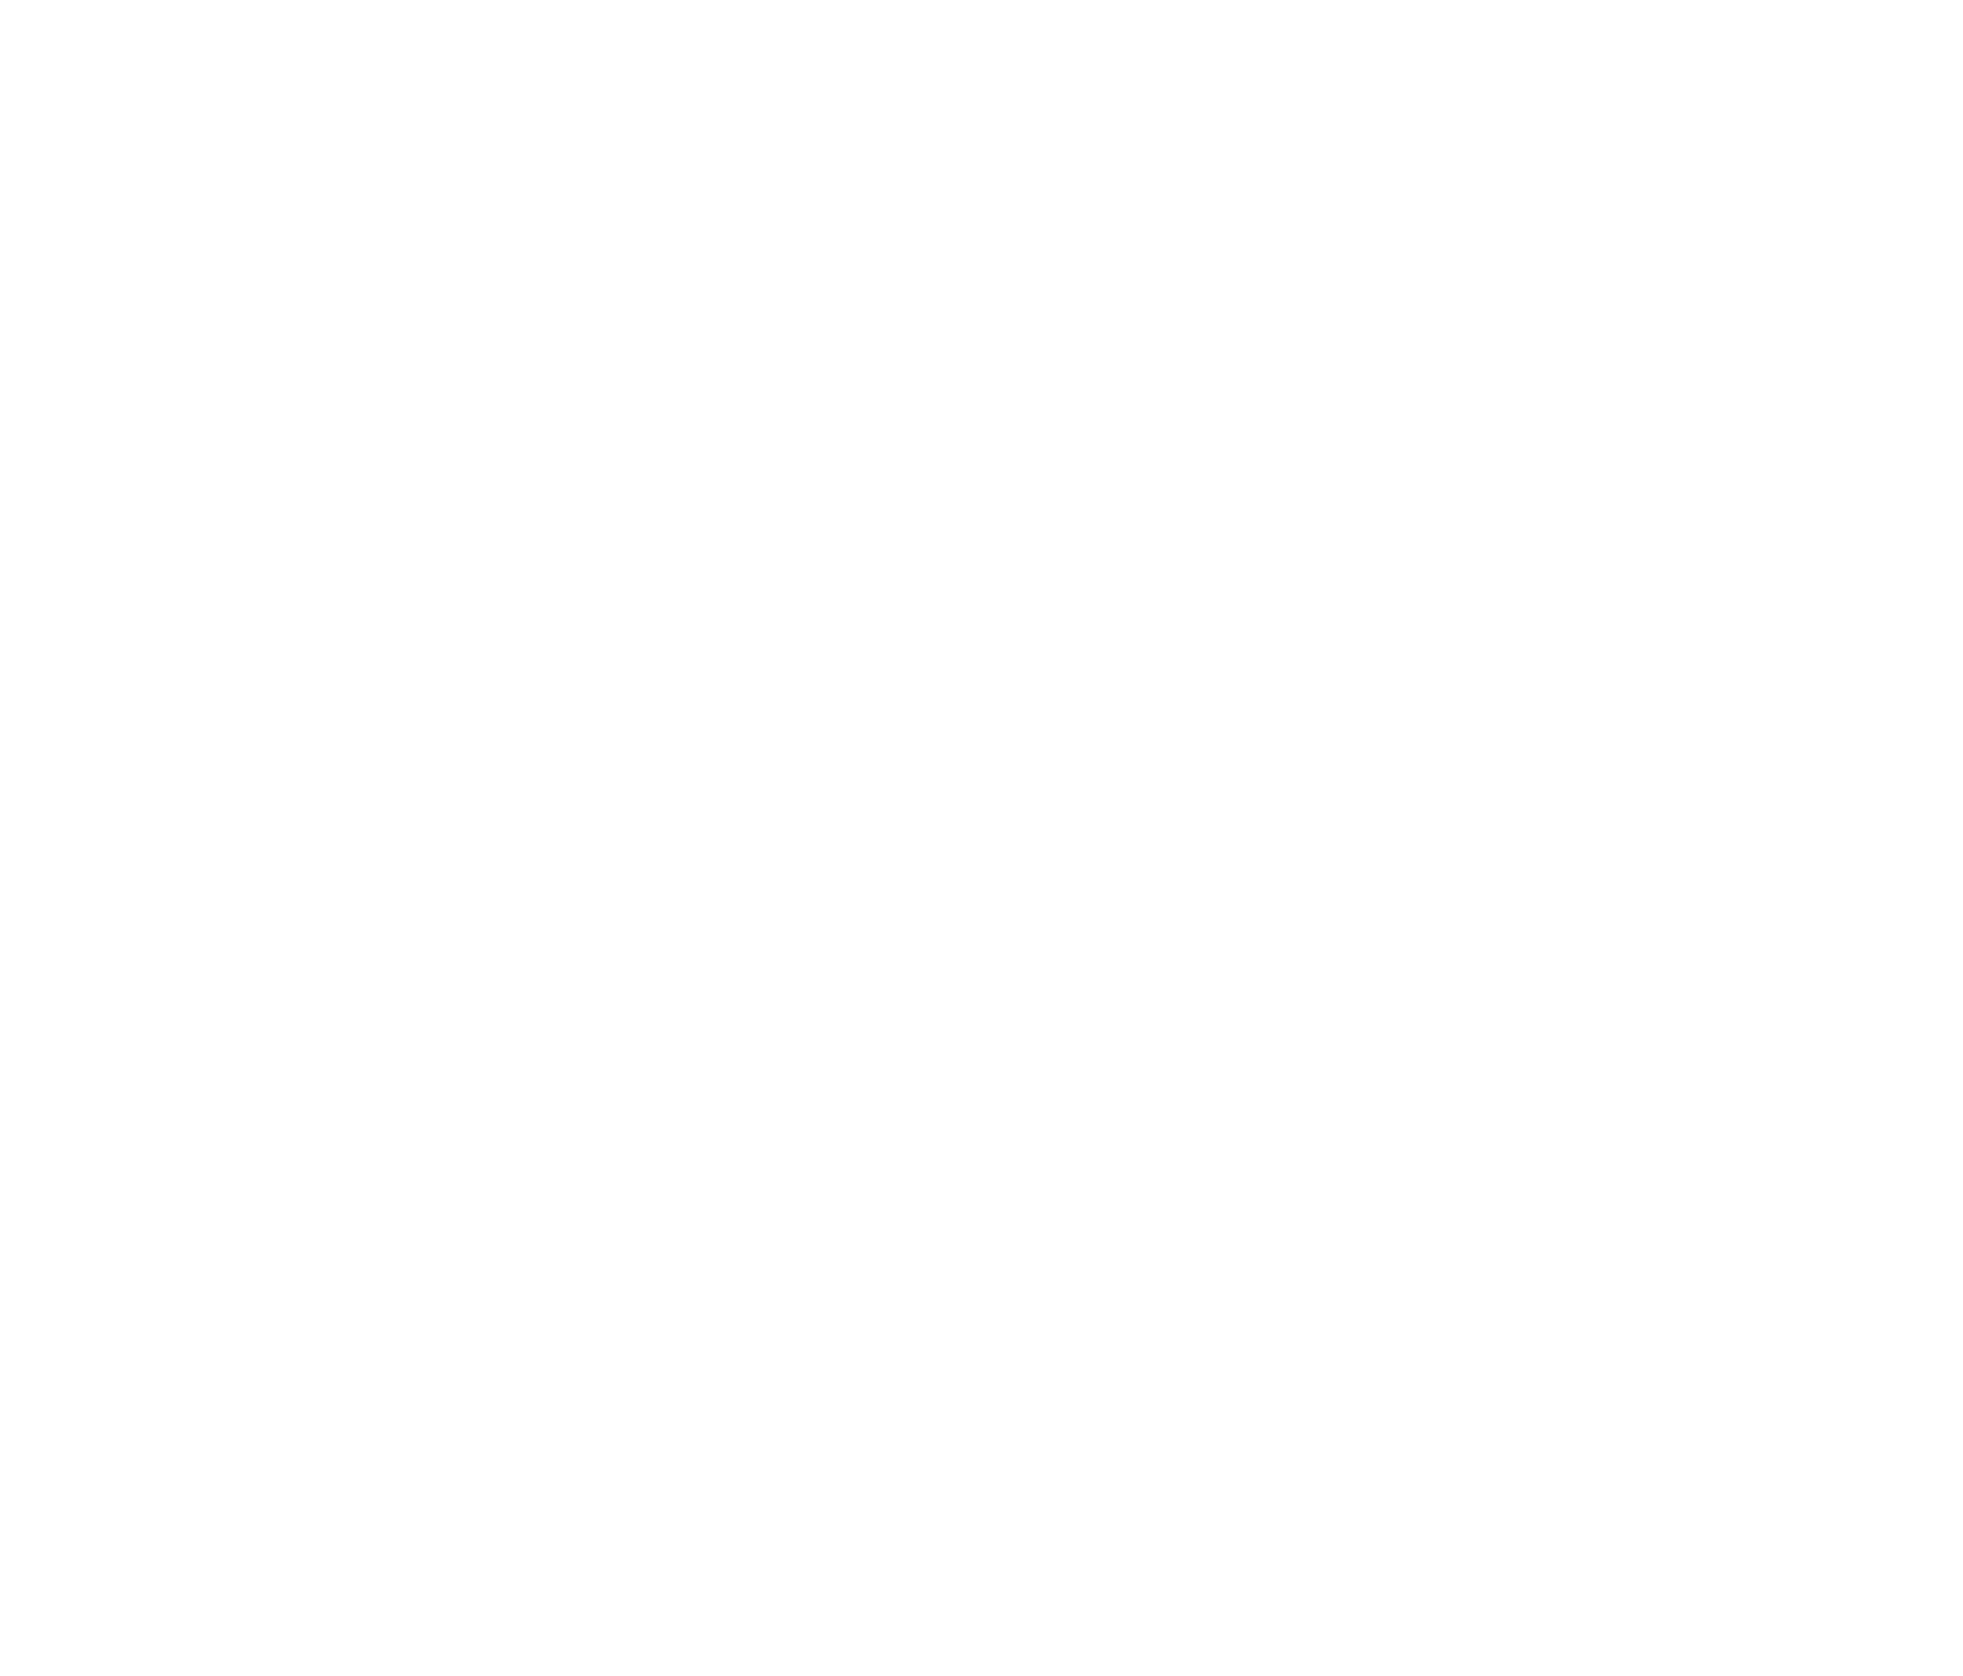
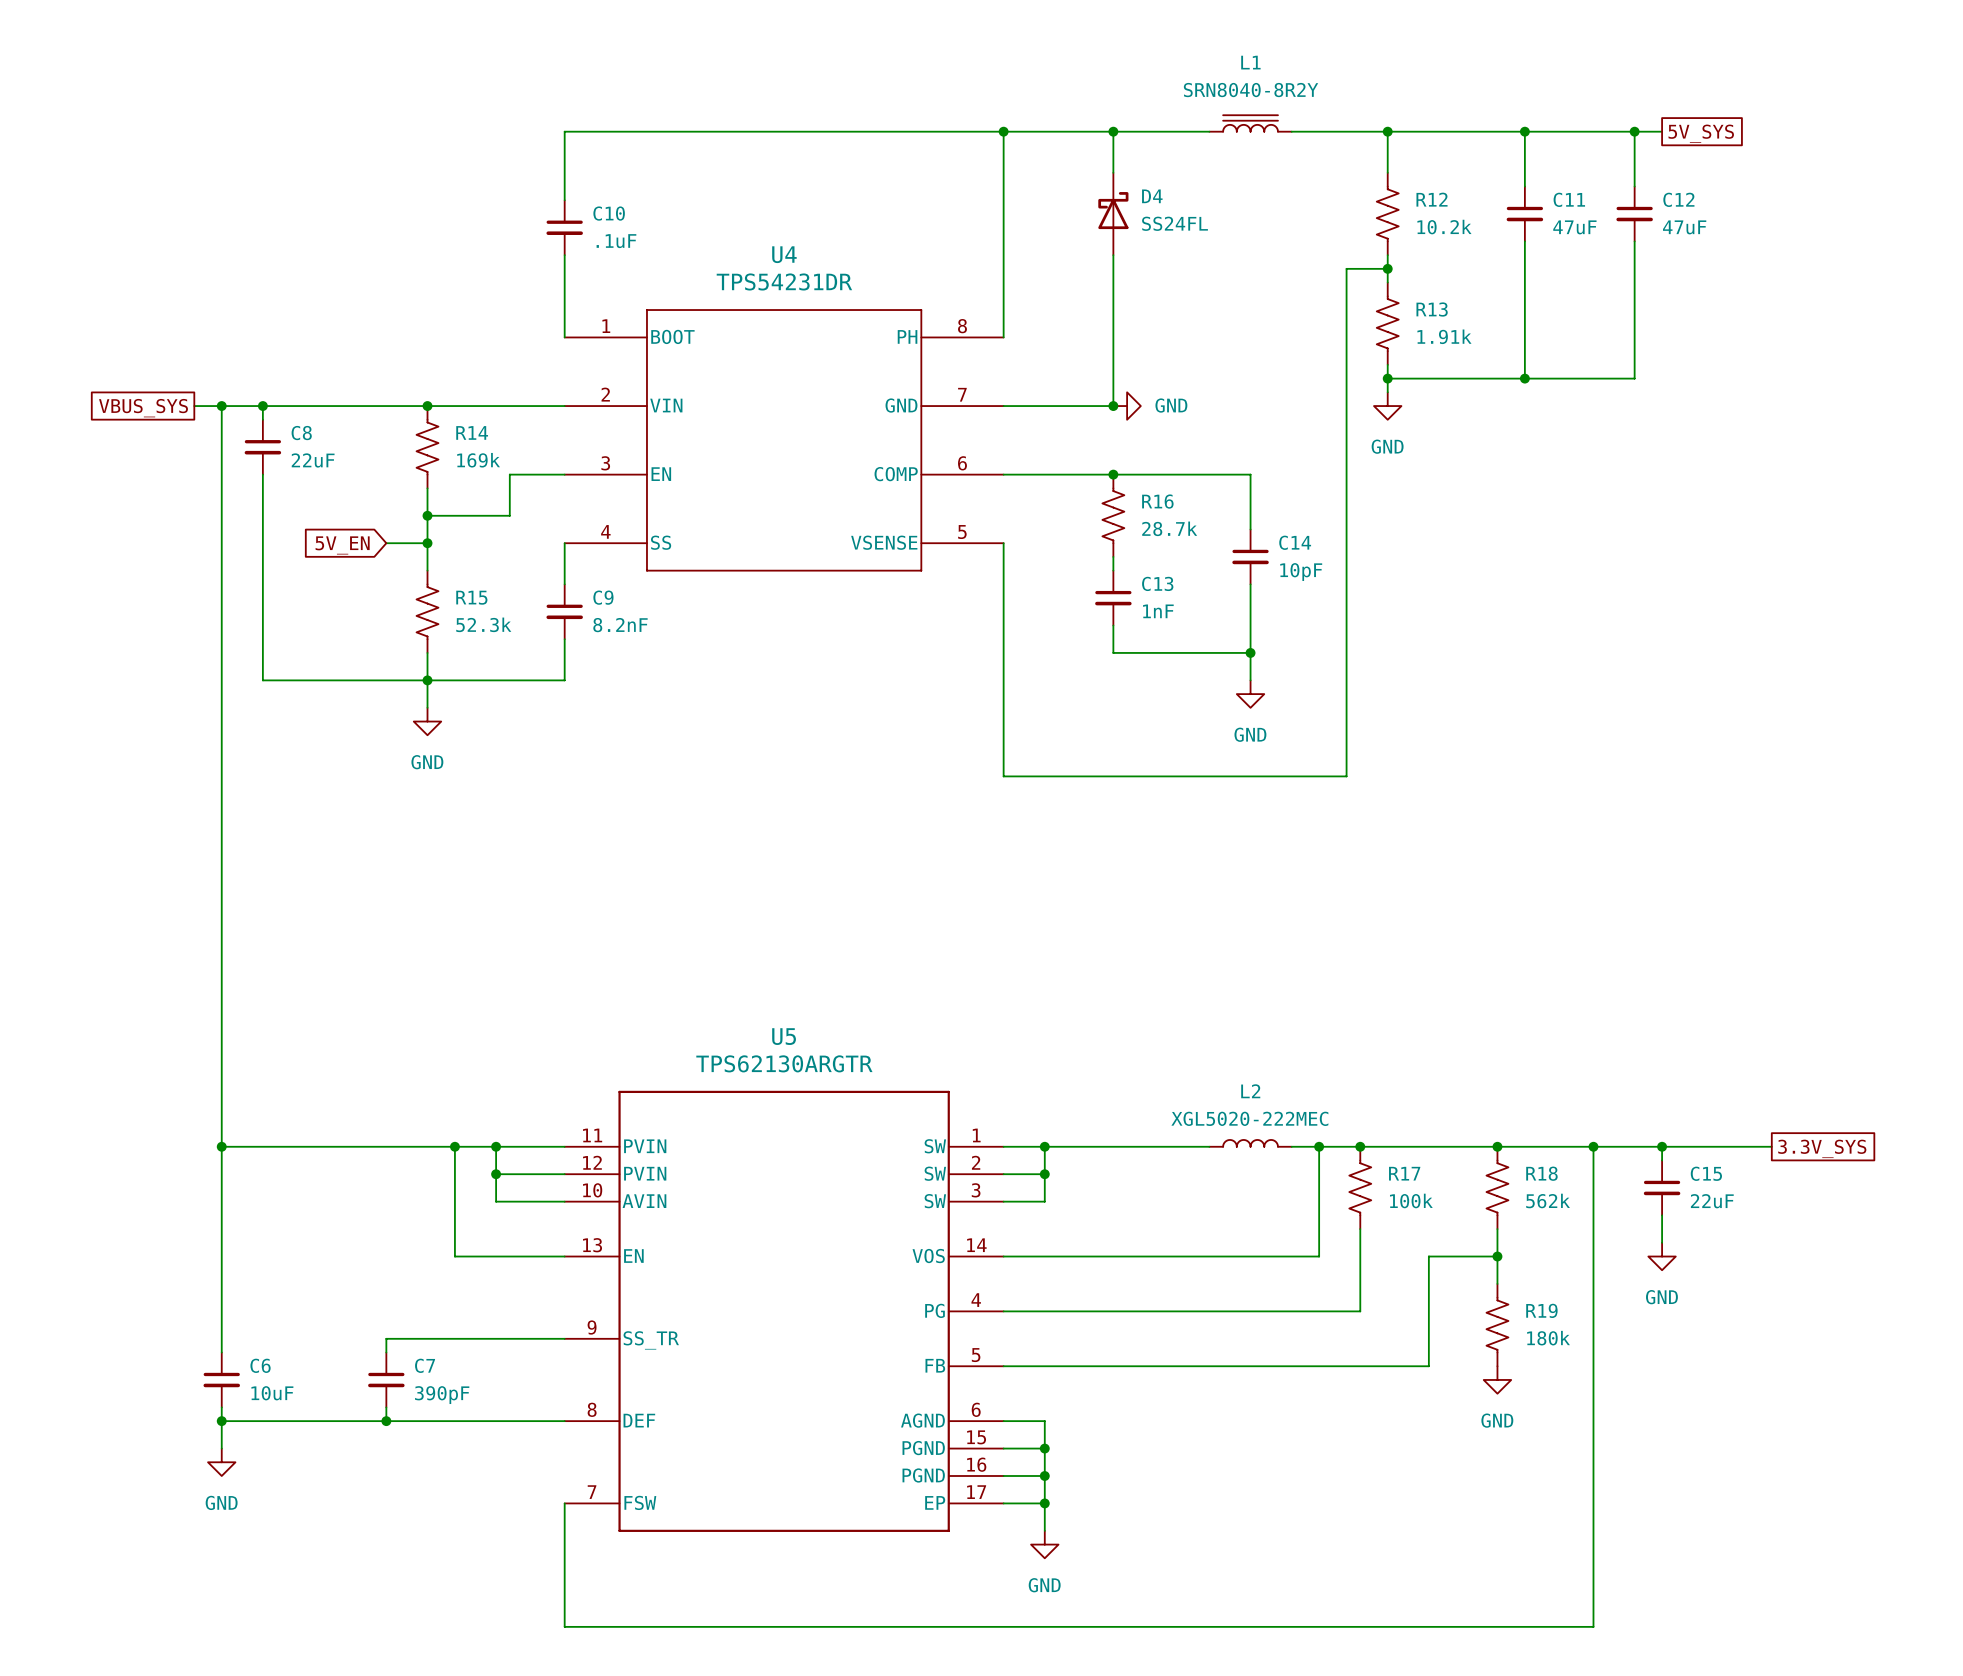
L1: none -> SRN8040-8R2Y (1250, 123)
wire: none -> (1003, 131) (1003, 337)
junction: none -> (1003, 131)
wire: none -> (1113, 131) (1113, 172)
junction: none -> (1113, 131)
wire: none -> (1209, 131) (564, 131) (564, 200)
wire: none -> (1291, 131) (1662, 131)
wire: none -> (1387, 131) (1387, 172)
junction: none -> (1387, 131)
wire: none -> (1524, 131) (1524, 186)
junction: none -> (1524, 131)
wire: none -> (1634, 131) (1634, 186)
junction: none -> (1634, 131)
global label: none -> 5V_SYS (1701, 133)
D4: none -> SS24FL (1113, 213)
R12: none -> 10.2k (1387, 213)
C11: none -> 47uF (1524, 213)
C12: none -> 47uF (1634, 213)
C10: none -> .1uF (564, 227)
wire: none -> (1524, 241) (1524, 378)
wire: none -> (1634, 241) (1634, 378) (1387, 378)
wire: none -> (564, 255) (564, 337)
wire: none -> (1113, 255) (1113, 406) (1003, 406)
wire: none -> (1387, 255) (1387, 282)
wire: none -> (1387, 268) (1346, 268) (1346, 776) (1003, 776) (1003, 543)
junction: none -> (1387, 268)
R13: none -> 1.91k (1387, 323)
wire: none -> (1387, 364) (1387, 392)
junction: none -> (1387, 378)
junction: none -> (1524, 378)
wire: none -> (194, 406) (564, 406)
wire: none -> (221, 406) (221, 1352)
junction: none -> (221, 406)
wire: none -> (262, 406) (262, 419)
junction: none -> (262, 406)
junction: none -> (427, 406)
junction: none -> (1113, 406)
power symbol: none -> GND (1127, 406)
power symbol: none -> GND (1387, 406)
global label: none -> VBUS_SYS (143, 408)
U4: none -> TPS54231DR (784, 440)
C8: none -> 22uF (262, 447)
R14: none -> 169k (427, 447)
wire: none -> (262, 474) (262, 680) (564, 680) (564, 639)
wire: none -> (564, 474) (509, 474) (509, 515) (427, 515)
wire: none -> (1003, 474) (1250, 474) (1250, 529)
junction: none -> (1113, 474)
wire: none -> (427, 488) (427, 570)
junction: none -> (427, 515)
R16: none -> 28.7k (1113, 515)
wire: none -> (386, 543) (427, 543)
junction: none -> (427, 543)
wire: none -> (564, 543) (564, 584)
global label: none -> 5V_EN (342, 545)
wire: none -> (1113, 556) (1113, 570)
C14: none -> 10pF (1250, 556)
wire: none -> (1250, 584) (1250, 680)
C13: none -> 1nF (1113, 598)
R15: none -> 52.3k (427, 611)
C9: none -> 8.2nF (564, 611)
wire: none -> (1113, 625) (1113, 652) (1250, 652)
wire: none -> (427, 652) (427, 707)
junction: none -> (1250, 652)
junction: none -> (427, 680)
power symbol: none -> GND (1250, 694)
power symbol: none -> GND (427, 721)
L2: none -> XGL5020-222MEC (1250, 1143)
wire: none -> (221, 1146) (564, 1146)
junction: none -> (221, 1146)
wire: none -> (454, 1146) (454, 1256) (564, 1256)
junction: none -> (454, 1146)
wire: none -> (496, 1146) (496, 1201) (564, 1201)
junction: none -> (496, 1146)
wire: none -> (1003, 1146) (1209, 1146)
wire: none -> (1044, 1146) (1044, 1201) (1003, 1201)
junction: none -> (1044, 1146)
wire: none -> (1291, 1146) (1771, 1146)
wire: none -> (1319, 1146) (1319, 1256) (1003, 1256)
junction: none -> (1319, 1146)
junction: none -> (1360, 1146)
junction: none -> (1497, 1146)
wire: none -> (1593, 1146) (1593, 1626) (564, 1626) (564, 1503)
junction: none -> (1593, 1146)
wire: none -> (1662, 1146) (1662, 1160)
junction: none -> (1662, 1146)
global label: none -> 3.3V_SYS (1822, 1148)
wire: none -> (496, 1174) (564, 1174)
junction: none -> (496, 1174)
wire: none -> (1003, 1174) (1044, 1174)
junction: none -> (1044, 1174)
R17: none -> 100k (1360, 1187)
R18: none -> 562k (1497, 1187)
C15: none -> 22uF (1662, 1187)
wire: none -> (1662, 1215) (1662, 1242)
wire: none -> (1360, 1229) (1360, 1311) (1003, 1311)
wire: none -> (1497, 1229) (1497, 1283)
wire: none -> (1497, 1256) (1428, 1256) (1428, 1366) (1003, 1366)
junction: none -> (1497, 1256)
power symbol: none -> GND (1662, 1256)
U5: none -> TPS62130ARGTR (784, 1311)
R19: none -> 180k (1497, 1325)
wire: none -> (564, 1338) (386, 1338) (386, 1352)
C6: none -> 10uF (221, 1379)
C7: none -> 390pF (386, 1379)
power symbol: none -> GND (1497, 1379)
wire: none -> (221, 1407) (221, 1448)
wire: none -> (386, 1407) (386, 1421)
wire: none -> (221, 1421) (564, 1421)
junction: none -> (221, 1421)
junction: none -> (386, 1421)
wire: none -> (1003, 1421) (1044, 1421) (1044, 1530)
wire: none -> (1003, 1448) (1044, 1448)
junction: none -> (1044, 1448)
power symbol: none -> GND (221, 1462)
wire: none -> (1003, 1475) (1044, 1475)
junction: none -> (1044, 1475)
wire: none -> (1003, 1503) (1044, 1503)
junction: none -> (1044, 1503)
power symbol: none -> GND (1044, 1544)

